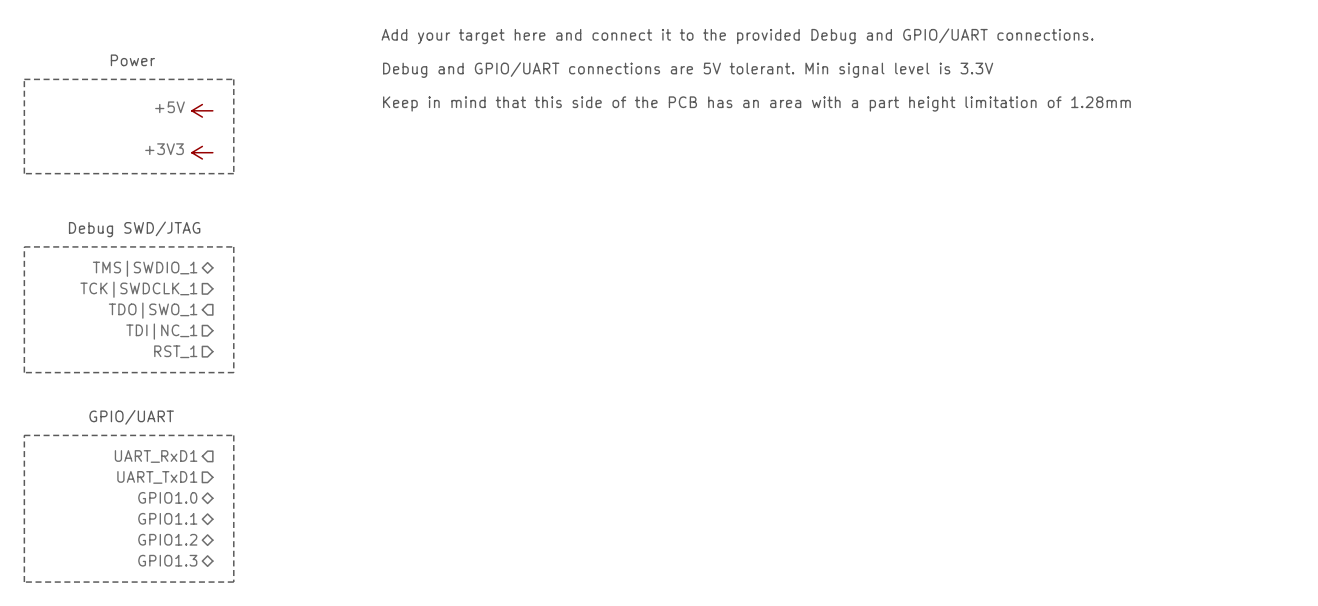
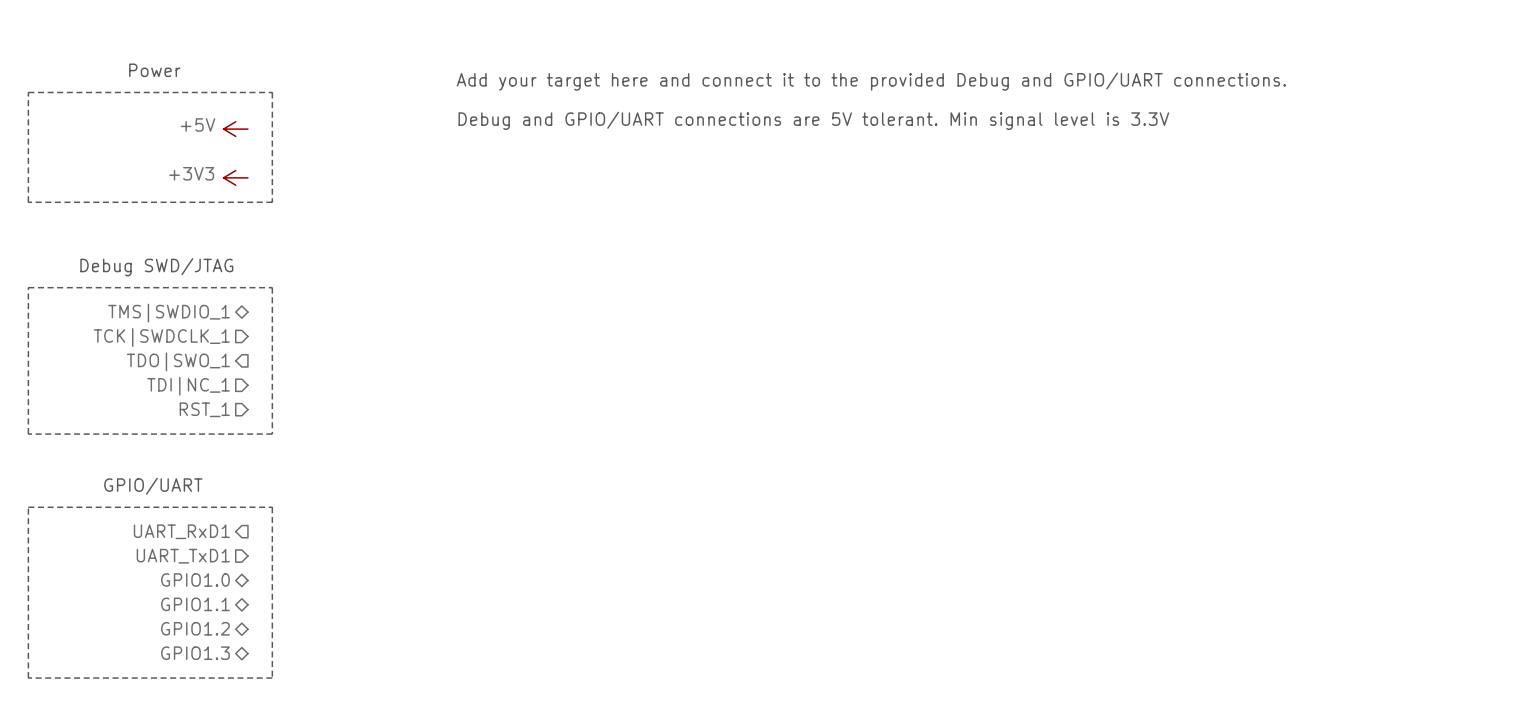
text position: Add your target here and connect it to the provided Debug and GPIO/UART connections. (737, 36) -> Add your target here and connect it to the provided Debug and GPIO/UART connections. (871, 81)
text position: Debug and GPIO/UART connections are 5V tolerant. Min signal level is 3.3V (688, 70) -> Debug and GPIO/UART connections are 5V tolerant. Min signal level is 3.3V (813, 120)
text: Keep in mind that this side of the PCB has an area with a part height limitation of 1.28mm (756, 103) -> none

